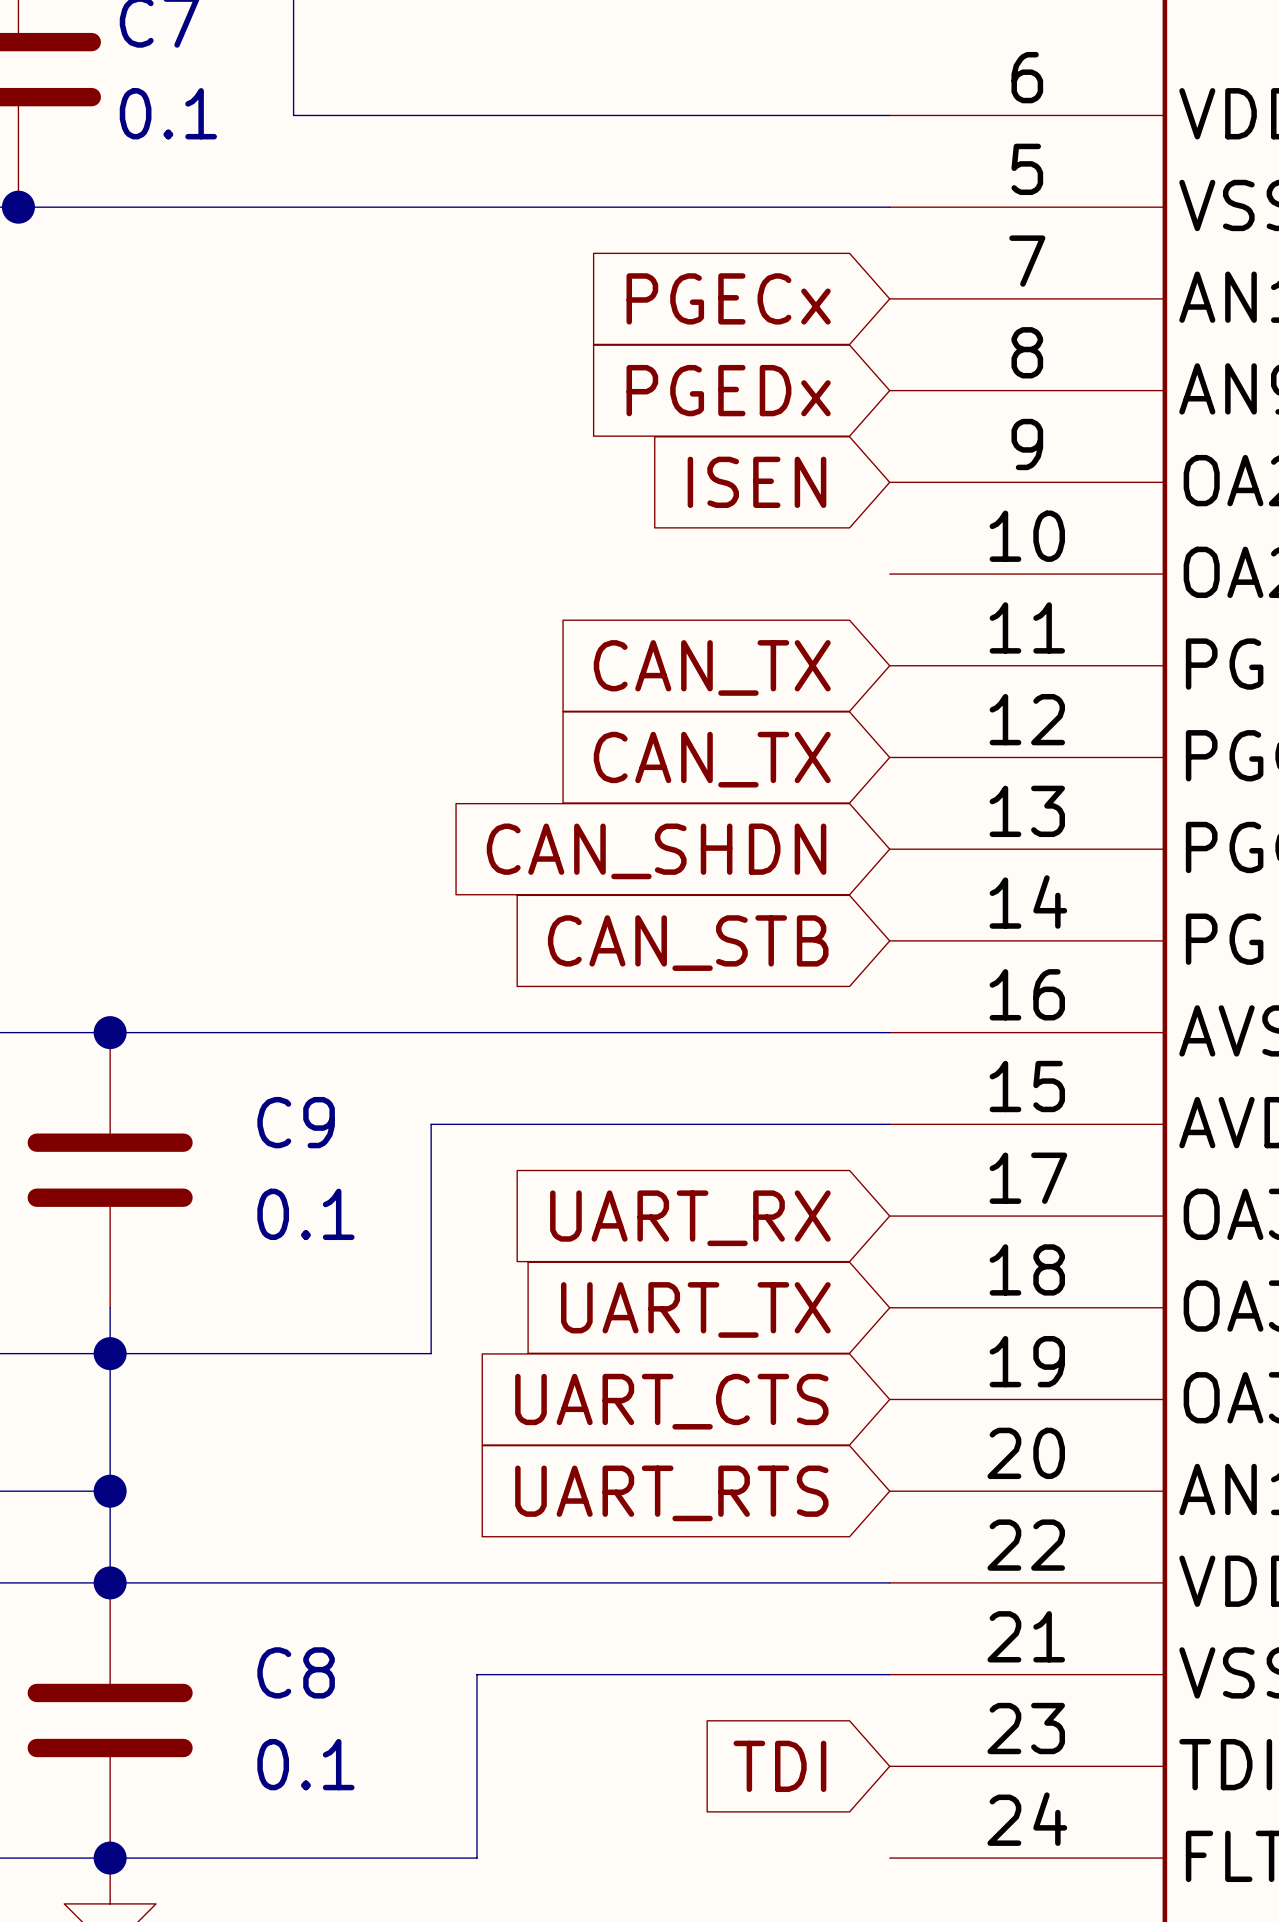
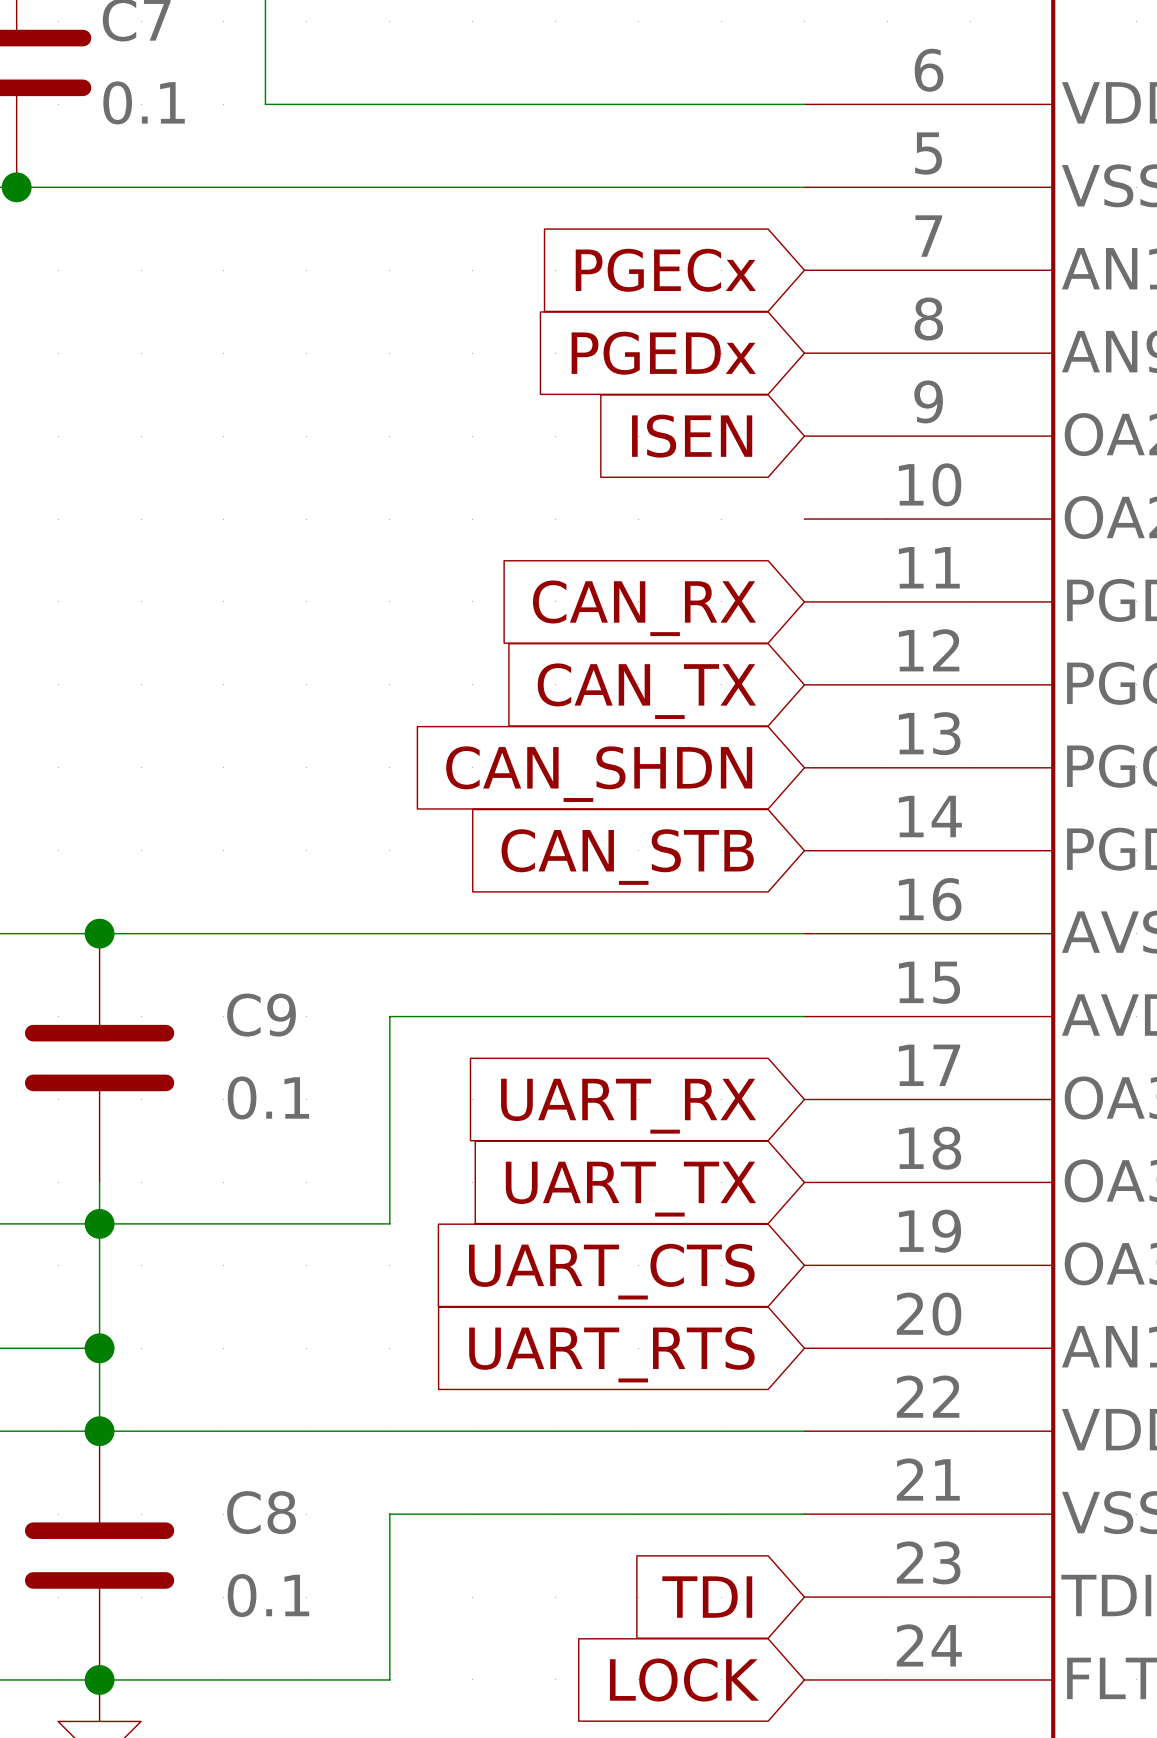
global label: CAN_TX (712, 667) -> CAN_RX (644, 608)
wire: (477, 1674) (477, 1858) (431, 1858) -> (431, 1514) (389, 1514) (389, 1679)
global label: none -> LOCK (684, 1680)

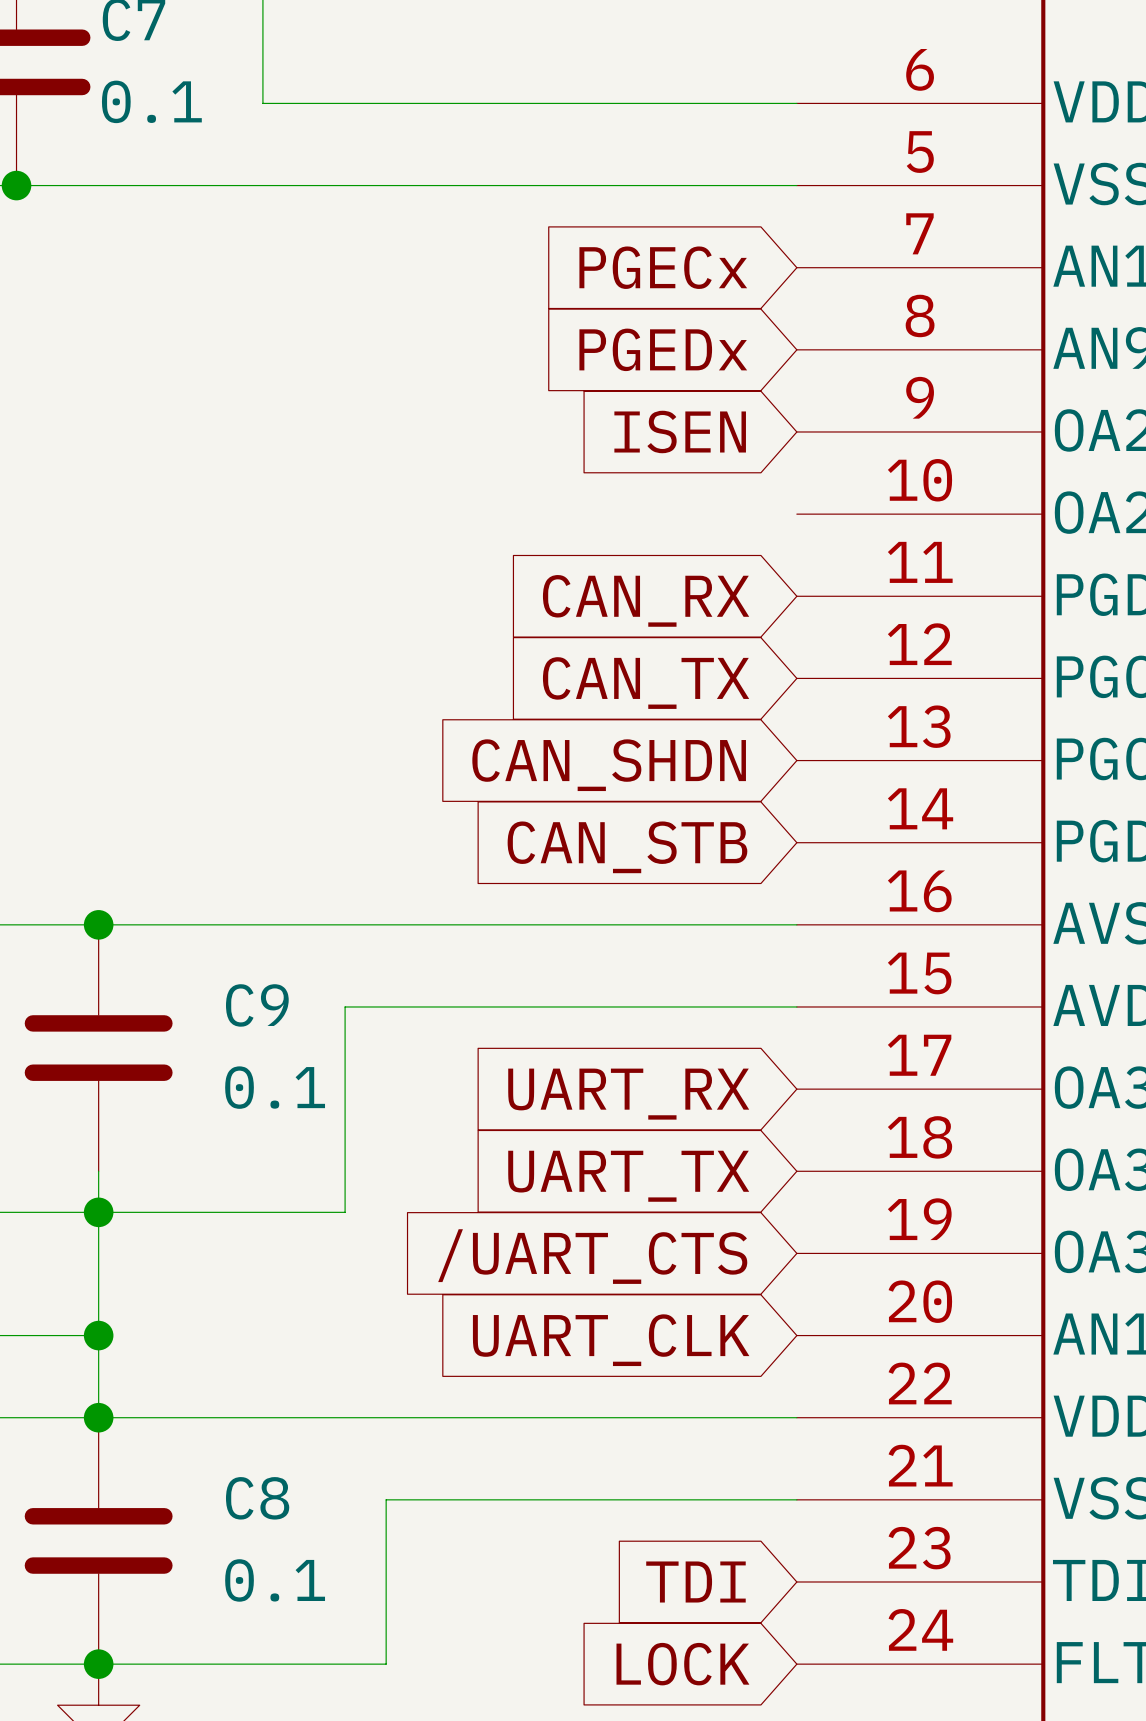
wire: (389, 1016) (389, 1223) (348, 1223) -> (386, 1006) (345, 1006) (345, 1212)
global label: UART_CTS (611, 1271) -> /UART_CTS (592, 1256)
global label: UART_RTS (611, 1354) -> UART_CLK (611, 1340)

